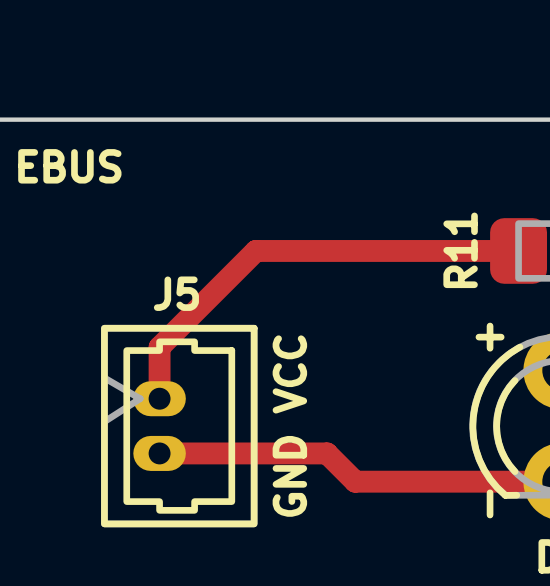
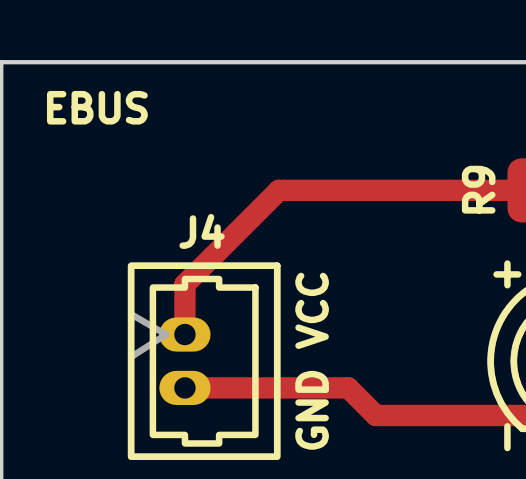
R11 name: R11 (460, 250) -> R9 (478, 189)
J5 name: J5 (176, 293) -> J4 (202, 231)

